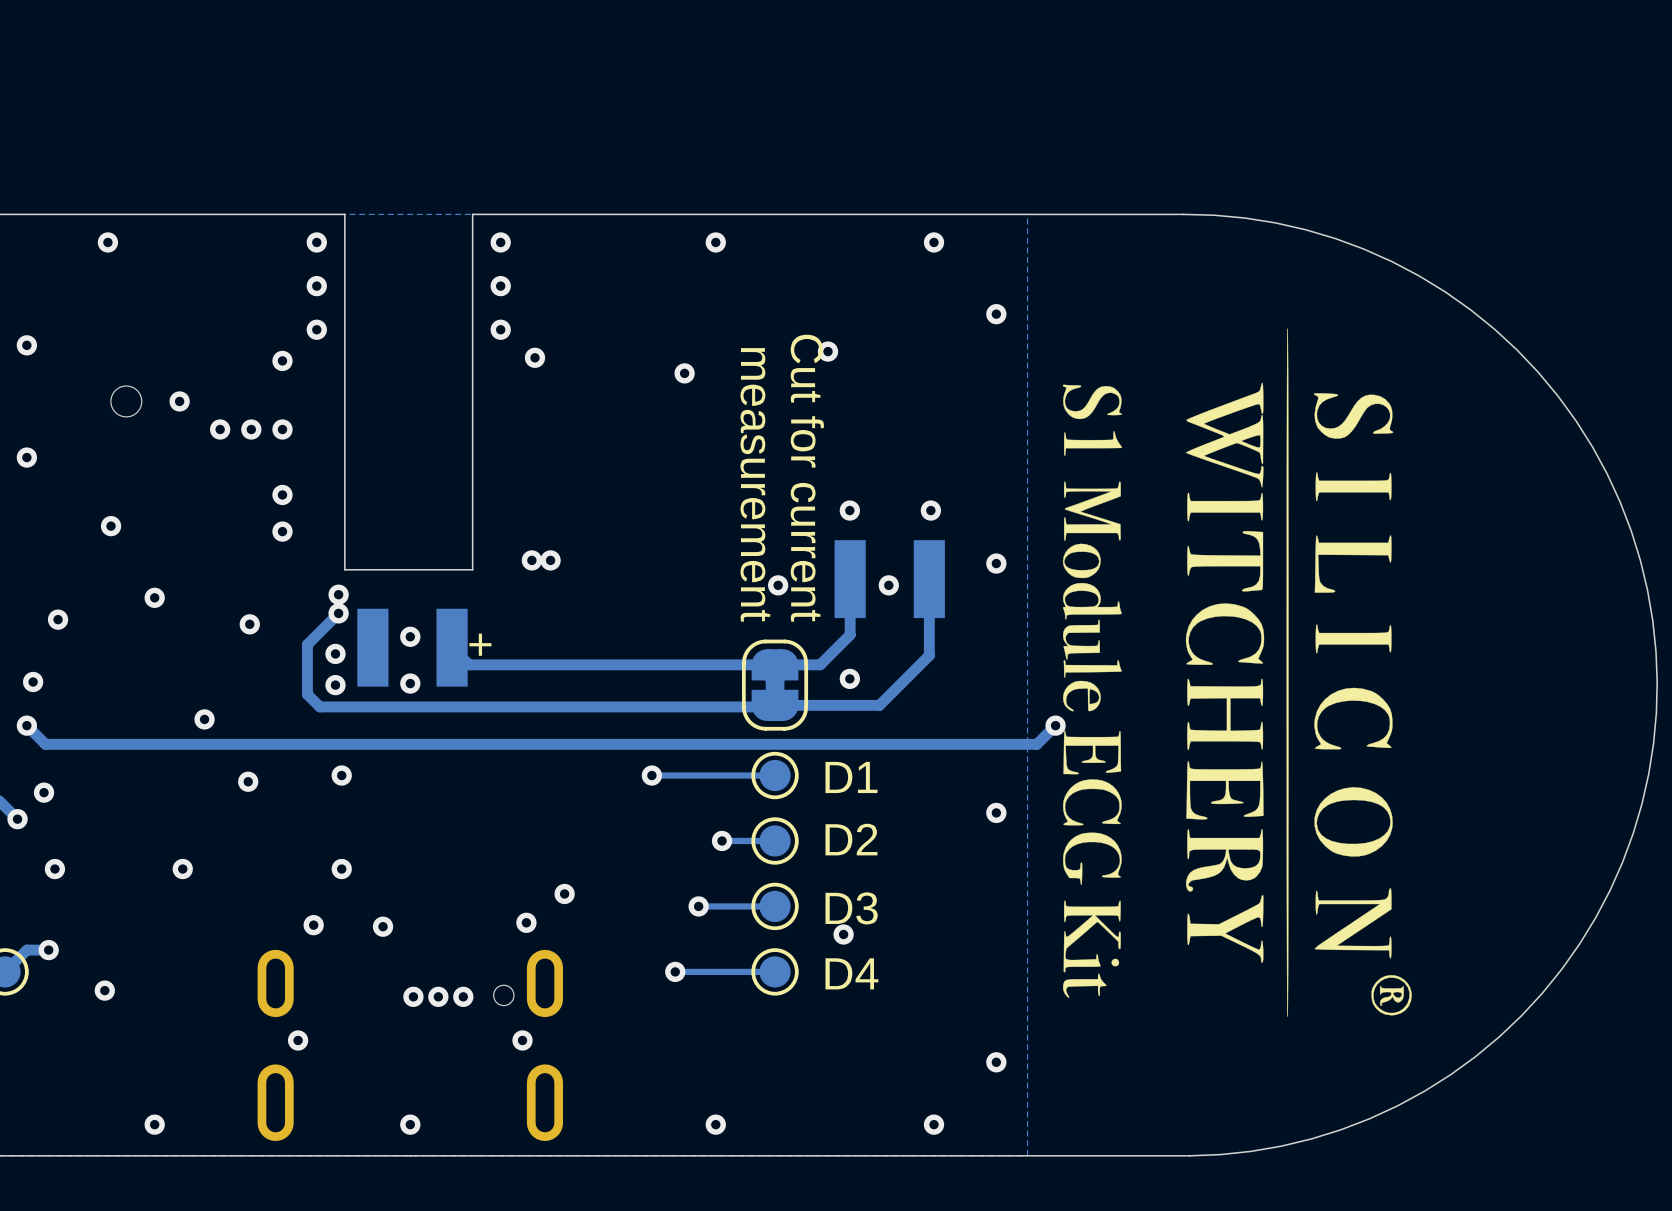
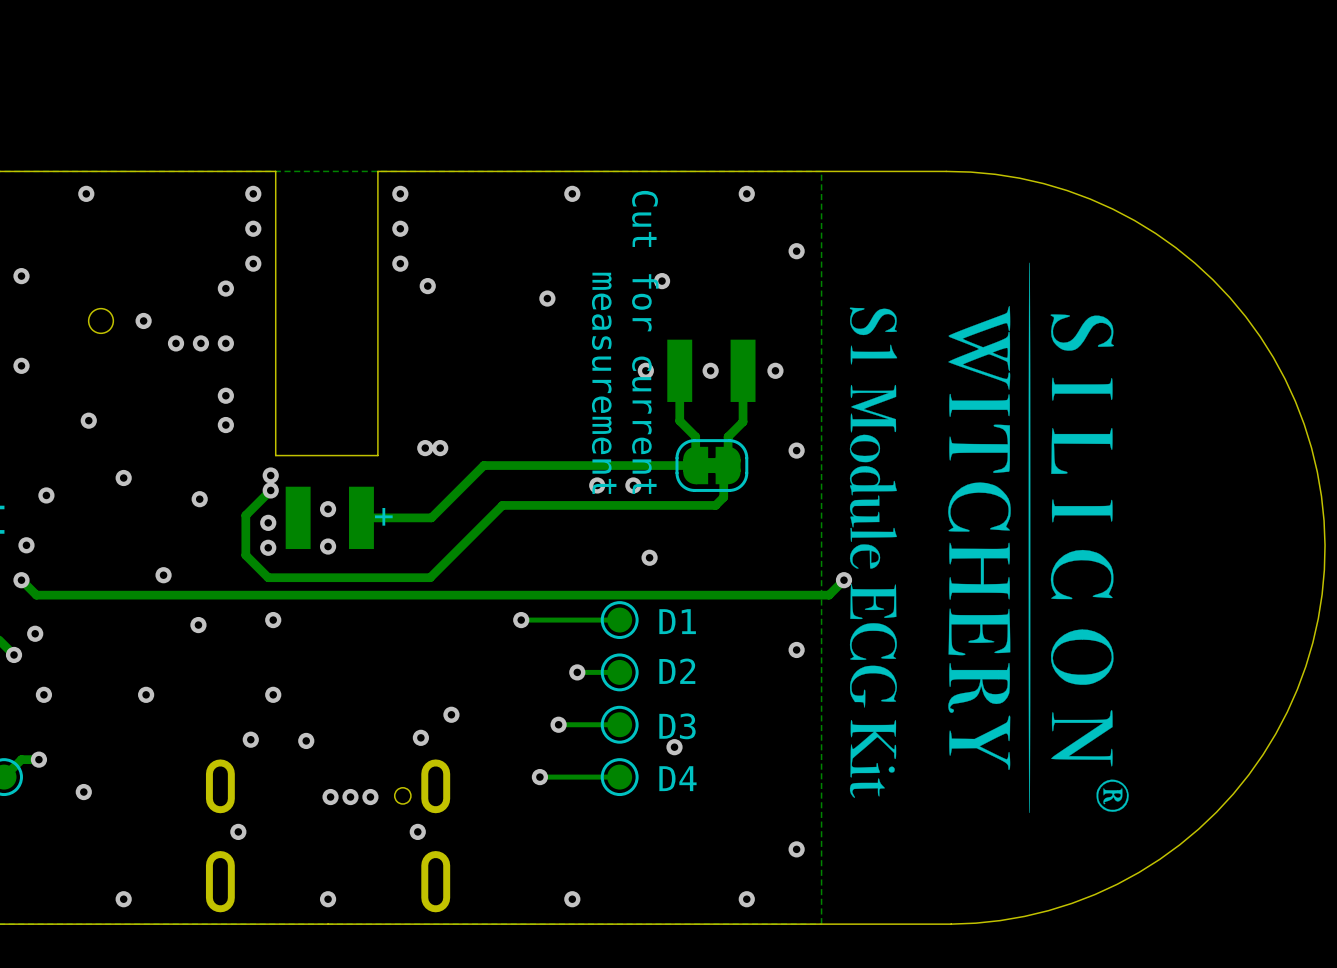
via: none -> (645, 370)
track: none -> (679, 370) (679, 420) (695, 436) (695, 465)
via: none -> (710, 370)
part: none -> (711, 370)
track: none -> (743, 370) (743, 421) (728, 436) (728, 465)
via: none -> (775, 370)
via: (849, 510) -> none
via: (930, 510) -> none
part footprint: [834, 540, 945, 619] -> [675, 439, 749, 492]
track: (850, 579) (850, 634) (820, 664) (469, 664) (452, 647) -> (695, 464) (483, 465) (431, 517) (361, 517)
track: (929, 579) (929, 655) (879, 705) (319, 706) -> (723, 469) (723, 497) (715, 505) (502, 505) (430, 577) (268, 577) (255, 565)
via: (778, 585) -> none
via: (888, 585) -> none
via: none -> (597, 485)
via: none -> (633, 485)
via position: (849, 678) -> (649, 557)
part: (775, 685) -> none

